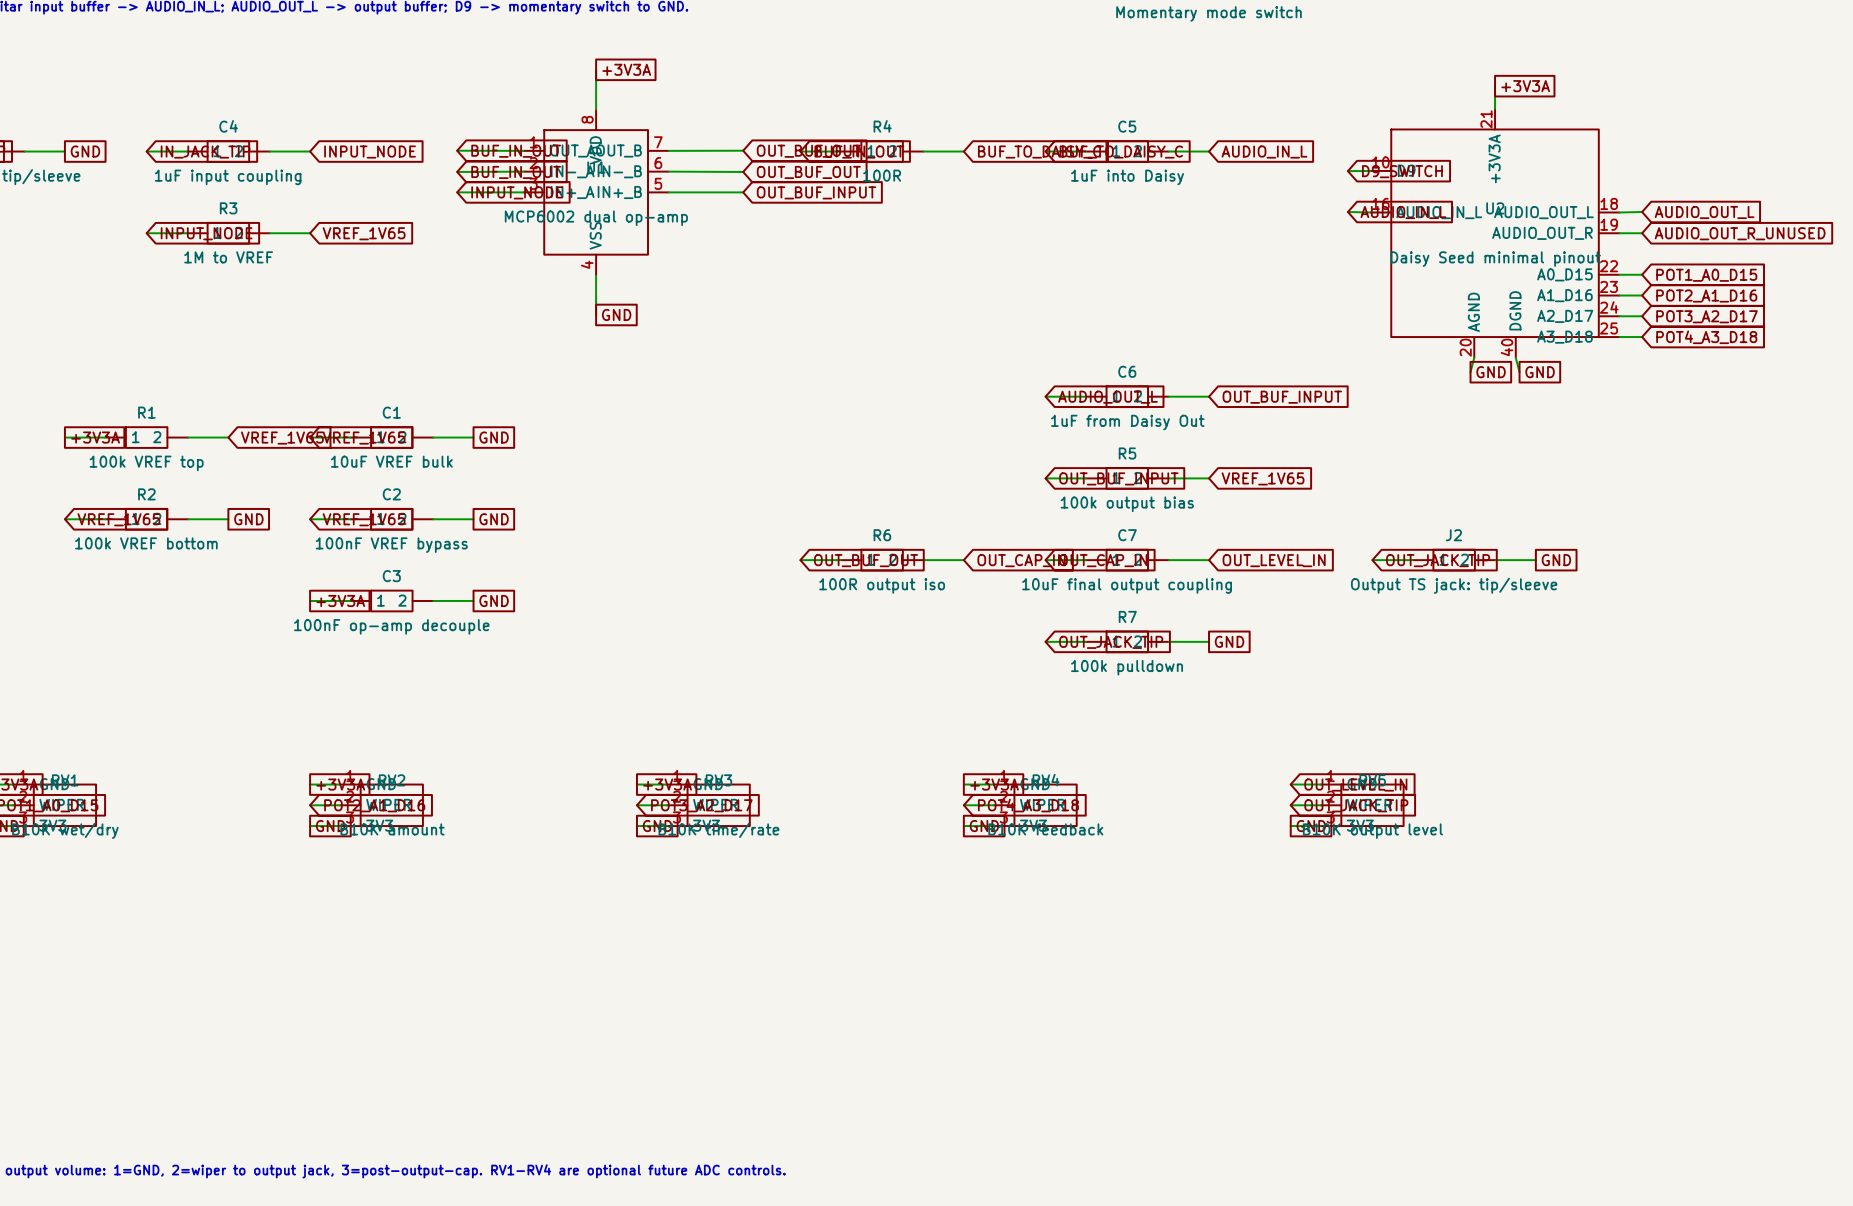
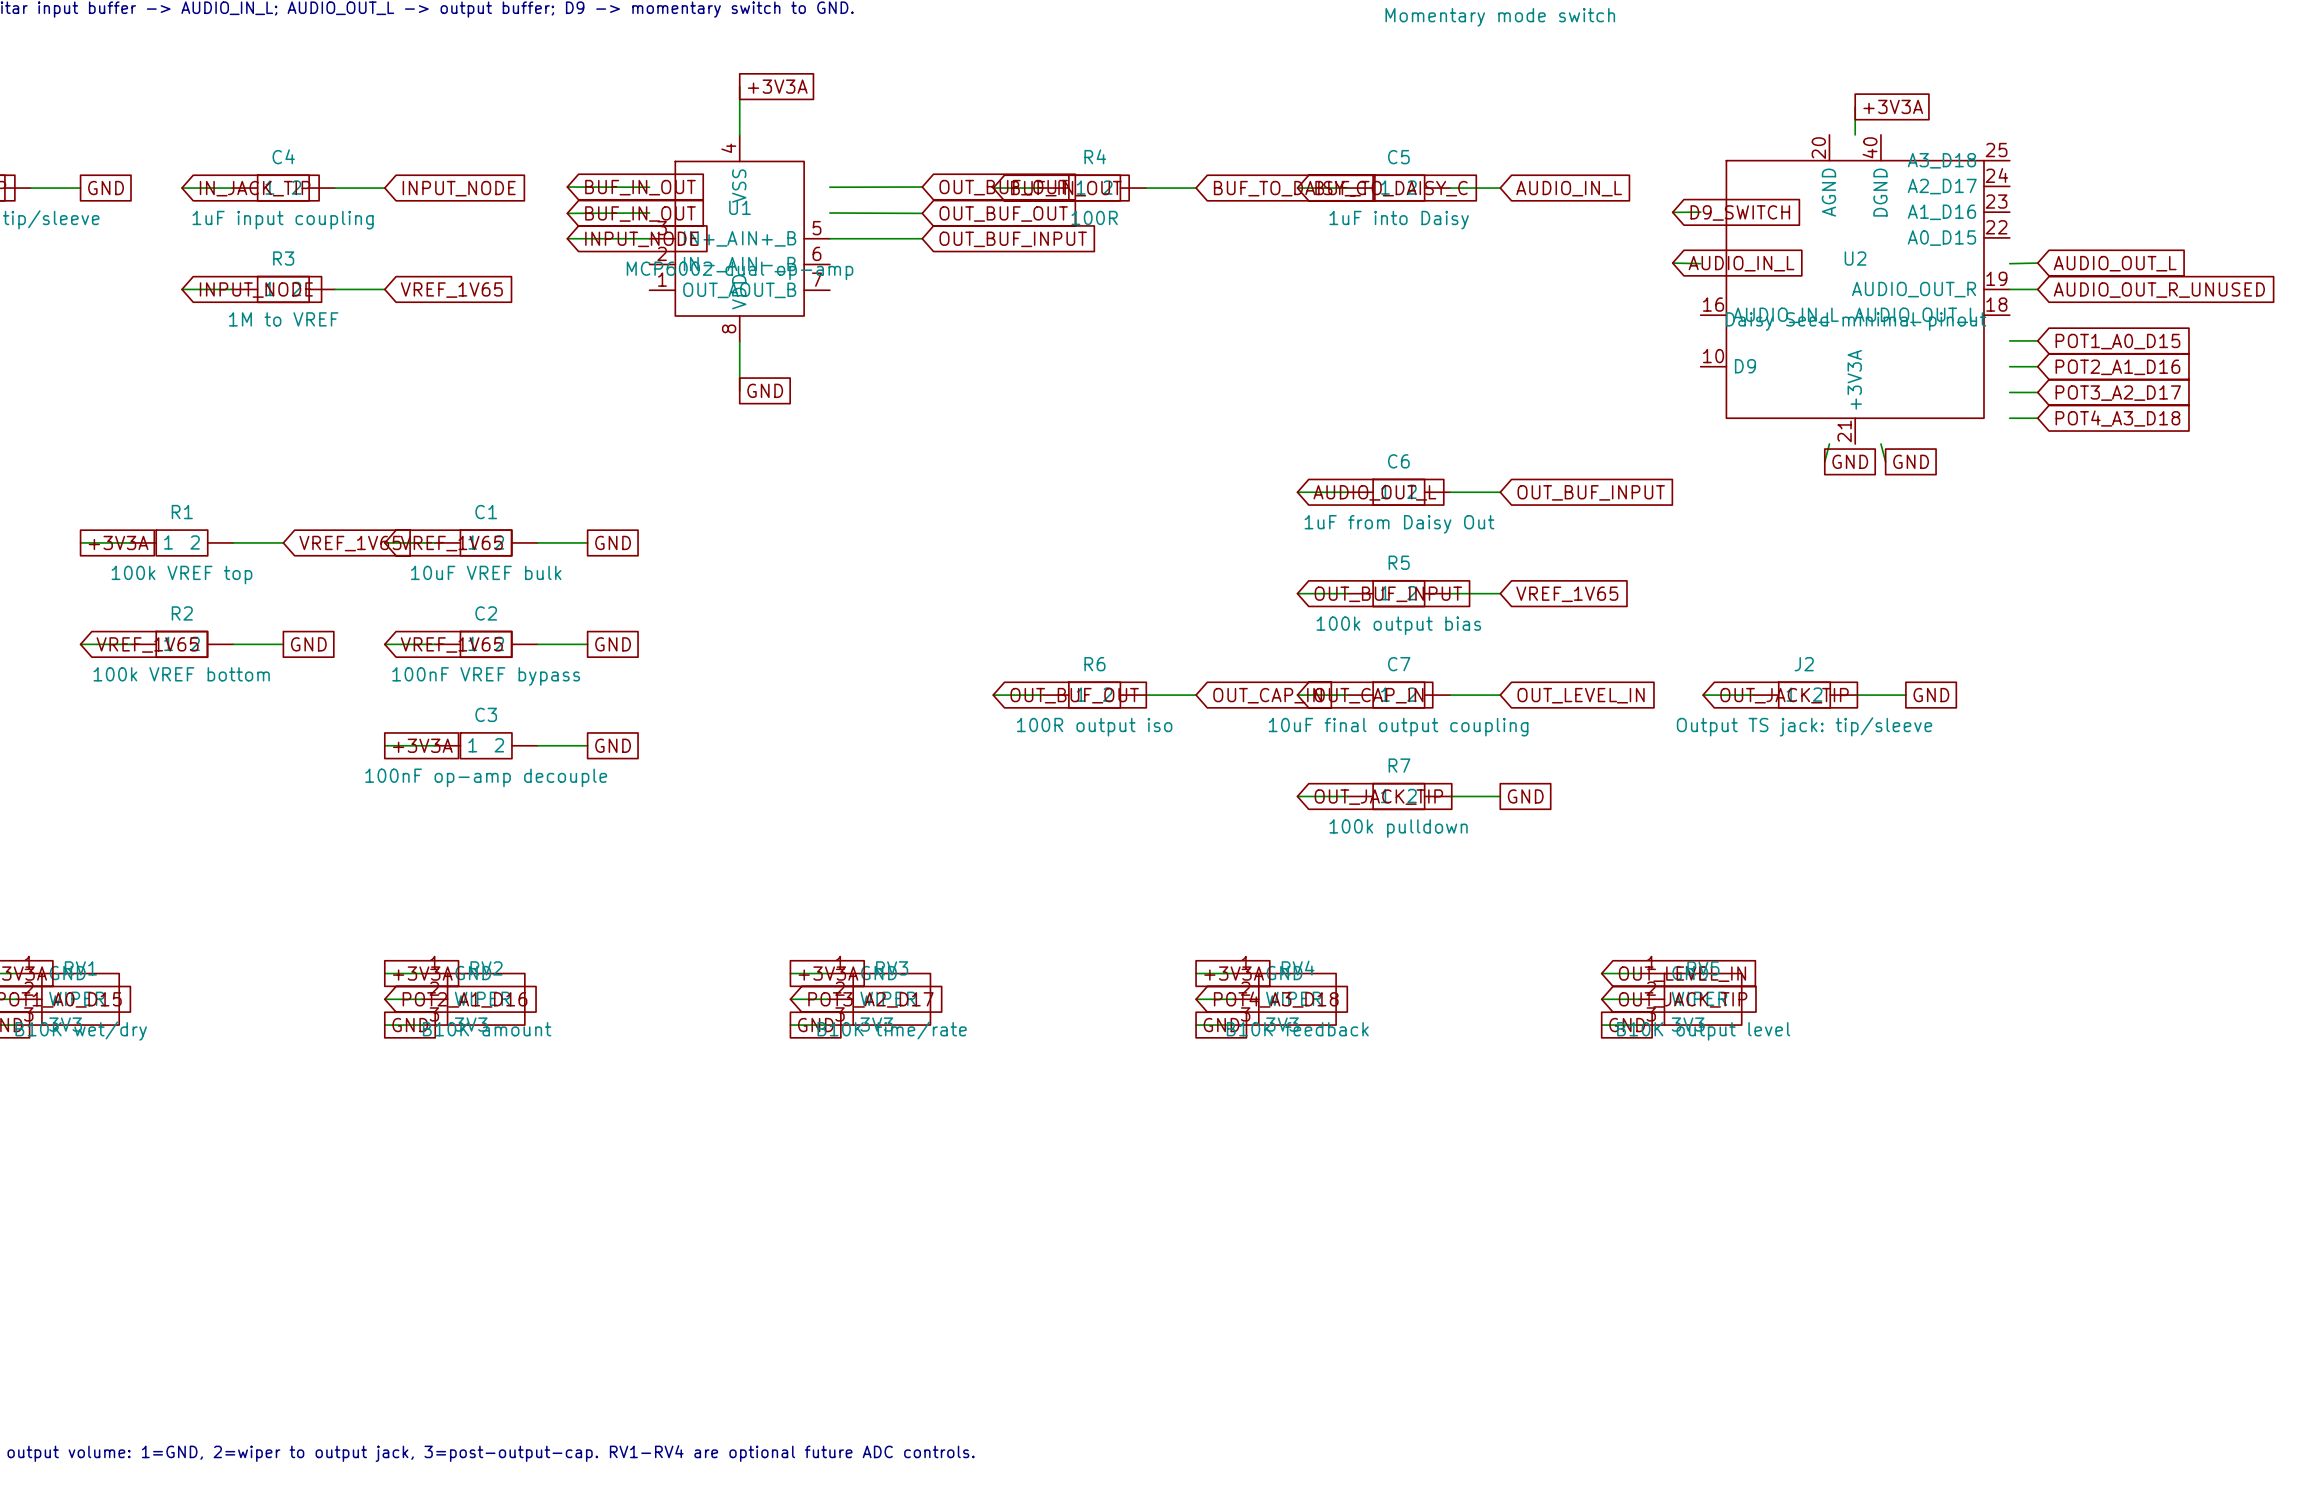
U1 flip: as is (596, 192) -> up-down (739, 238)
U2 flip: as is (1495, 233) -> up-down (1855, 289)

